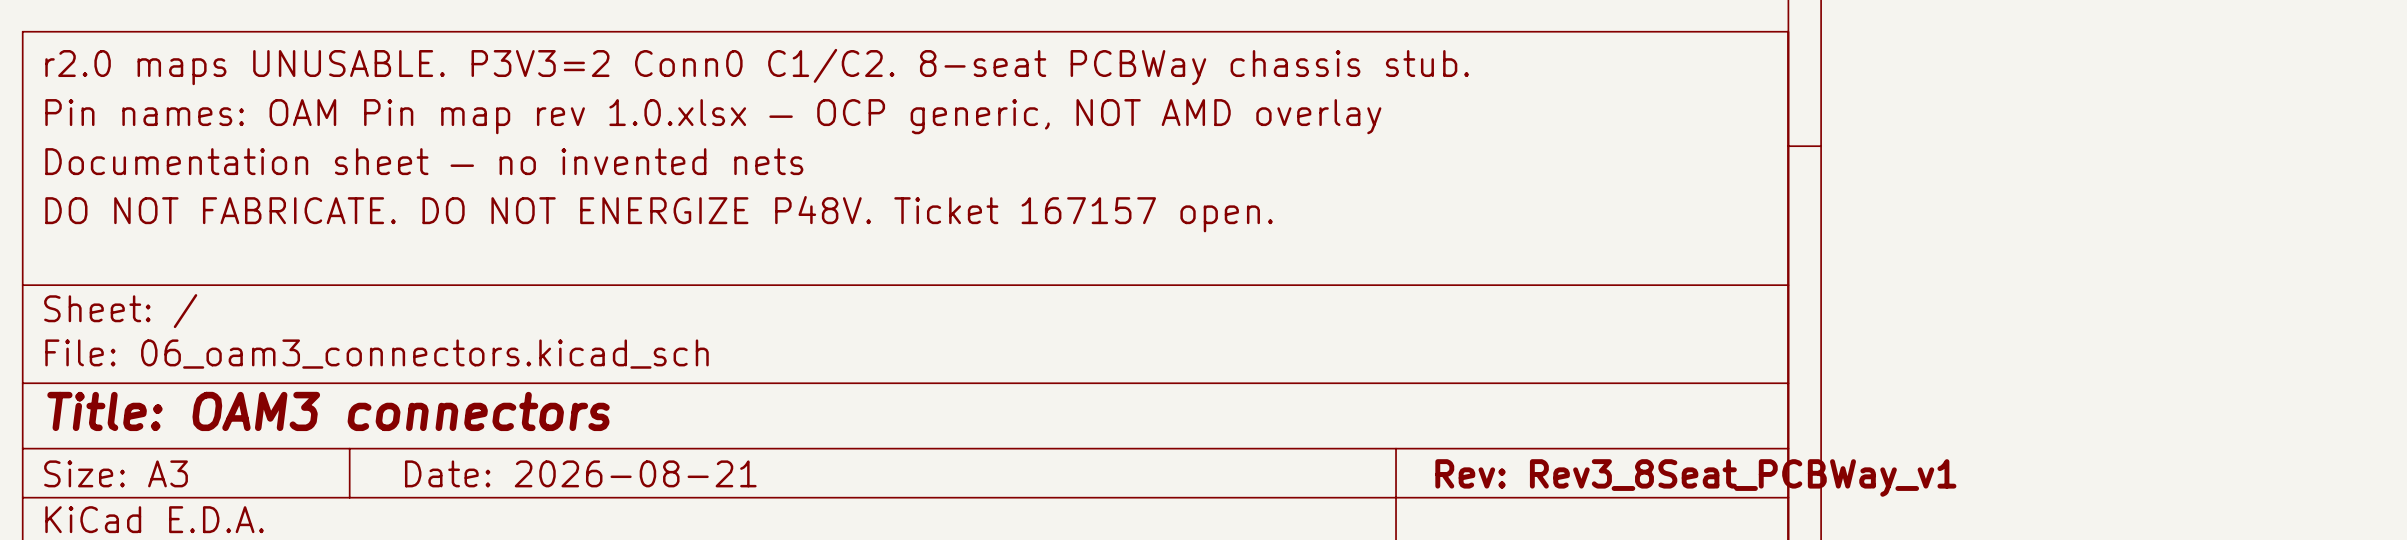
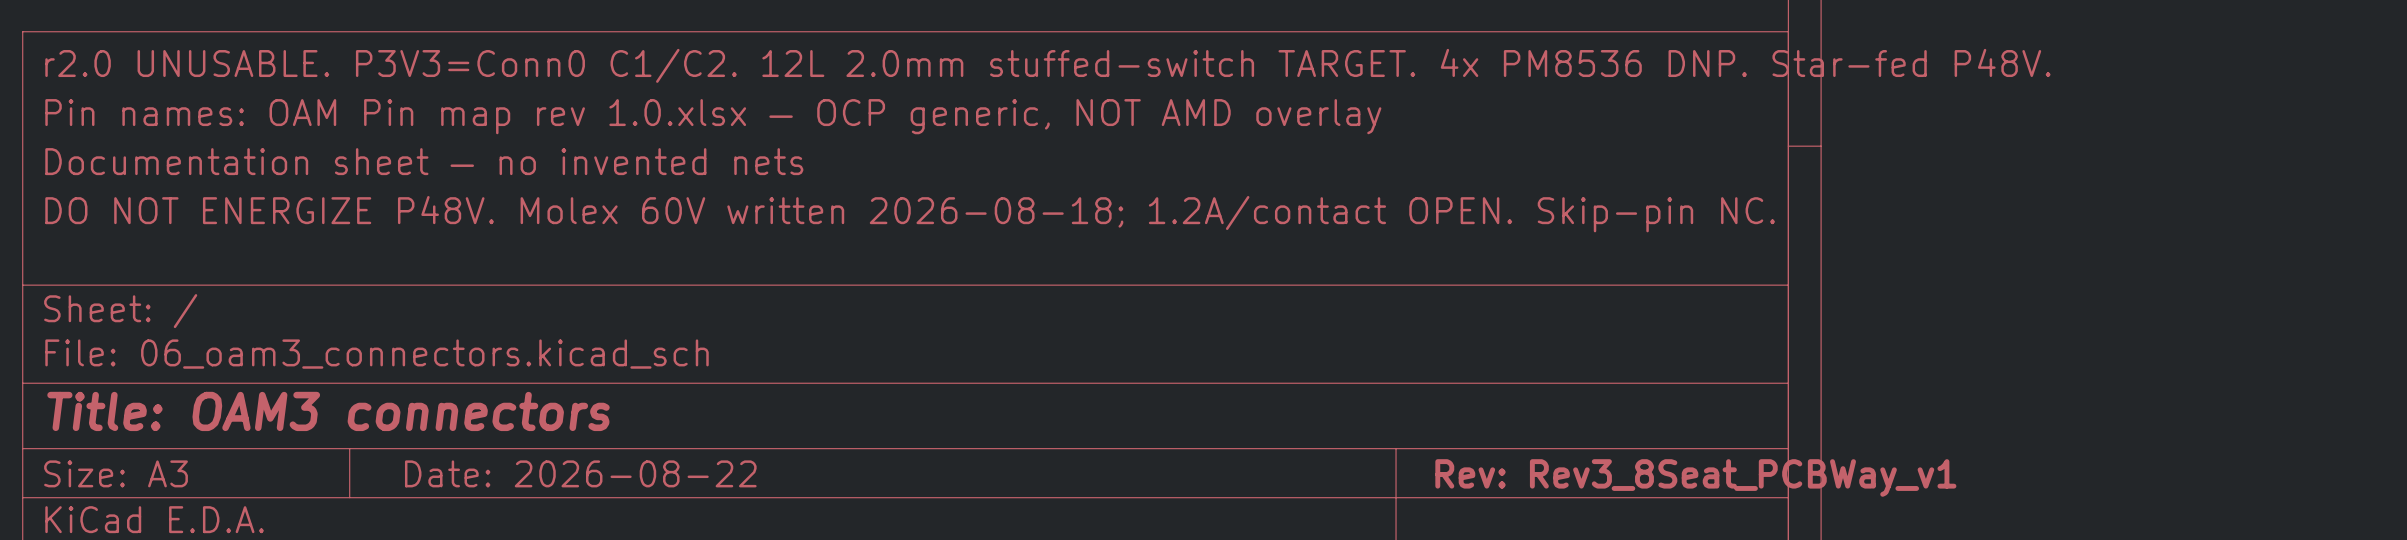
title block: r2.0 maps UNUSABLE. P3V3=2 Conn0 C1/C2. 8-seat PCBWay chassis stub. (757, 67) -> r2.0 UNUSABLE. P3V3=Conn0 C1/C2. 12L 2.0mm stuffed-switch TARGET. 4x PM8536 DNP. Star-fed P48V. (1047, 65)
title block: DO NOT FABRICATE. DO NOT ENERGIZE P48V. Ticket 167157 open. (659, 214) -> DO NOT ENERGIZE P48V. Molex 60V written 2026-08-18; 1.2A/contact OPEN. Skip-pin NC. (910, 214)
title block: Date: 2026-08-21 (580, 473) -> Date: 2026-08-22 (580, 473)

